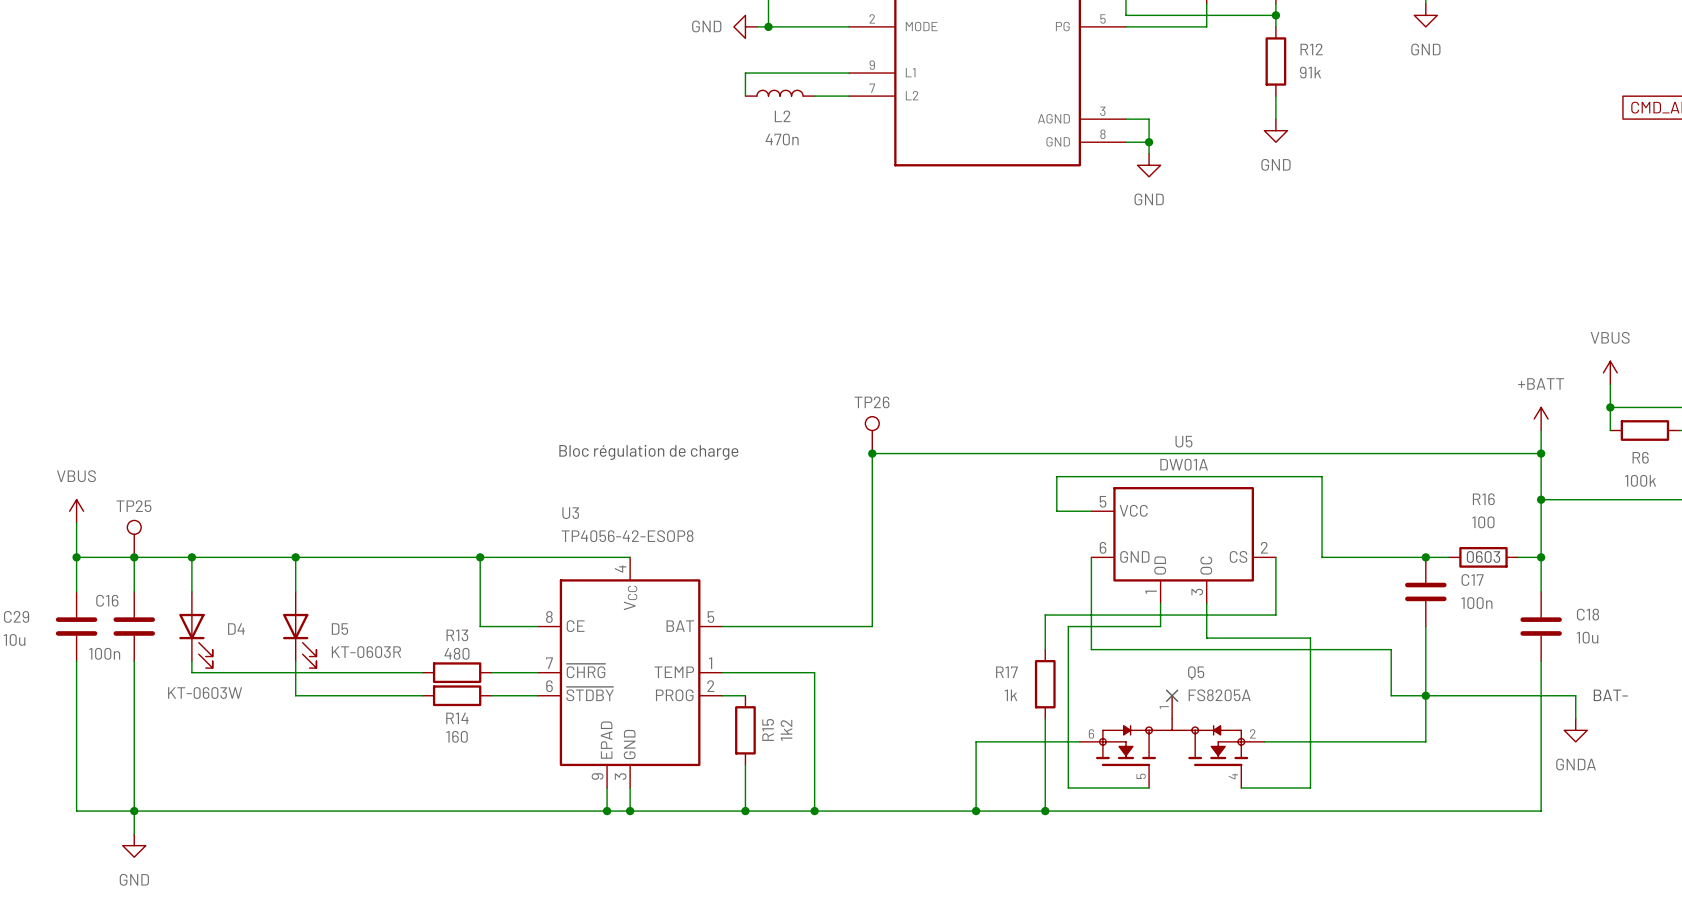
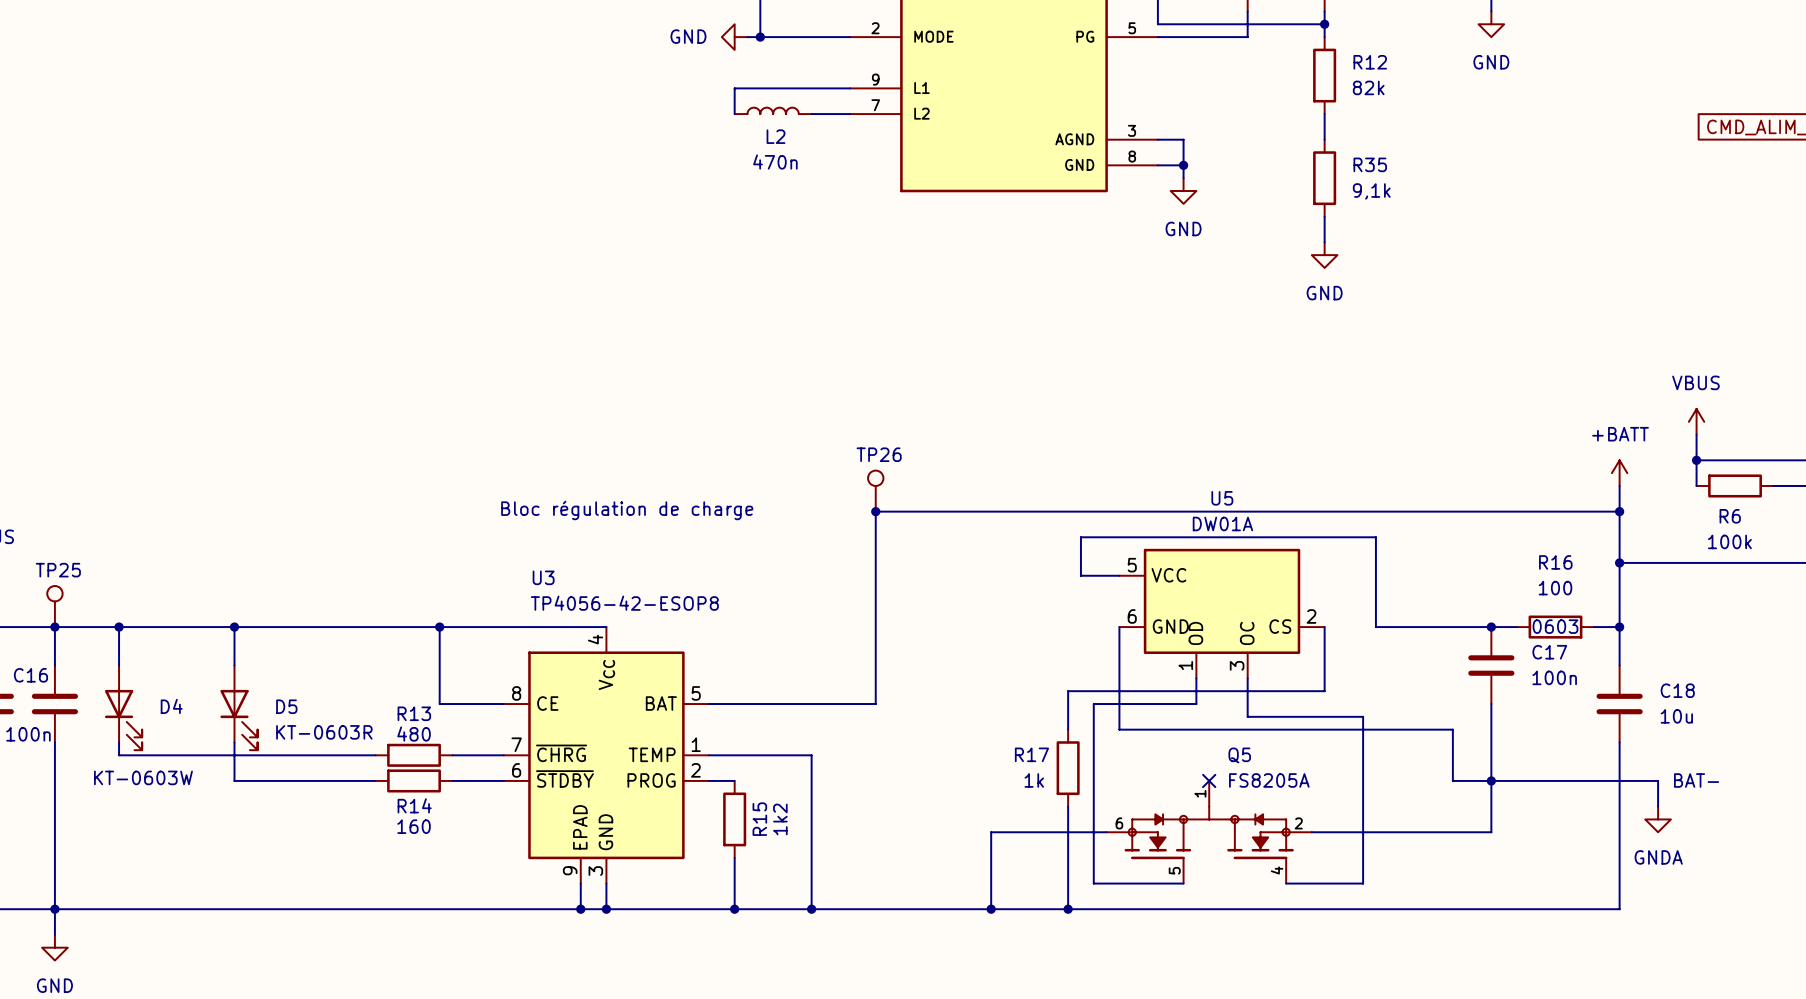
R12 value: 91k (1310, 72) -> 82k (1368, 87)
power symbol position: GND (1275, 130) -> GND (1324, 255)
R35: none -> 9,1k (1324, 178)
wire: none -> (1324, 216) (1324, 242)

